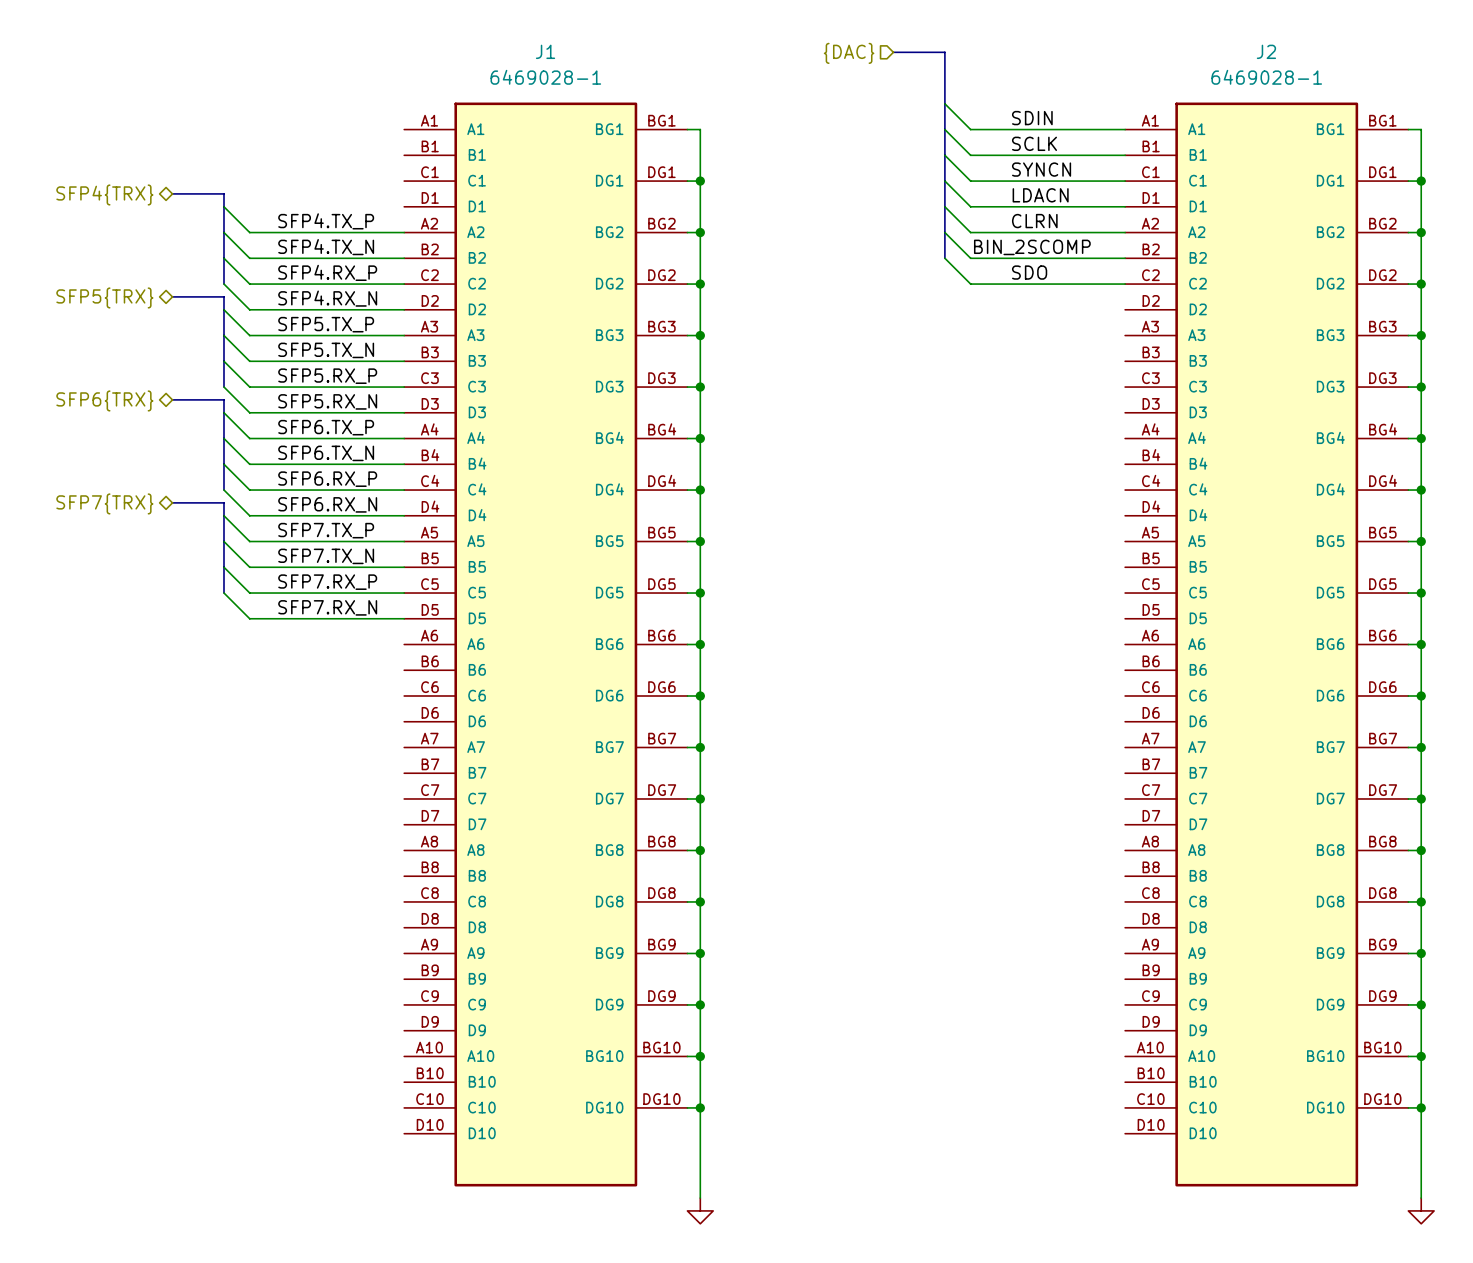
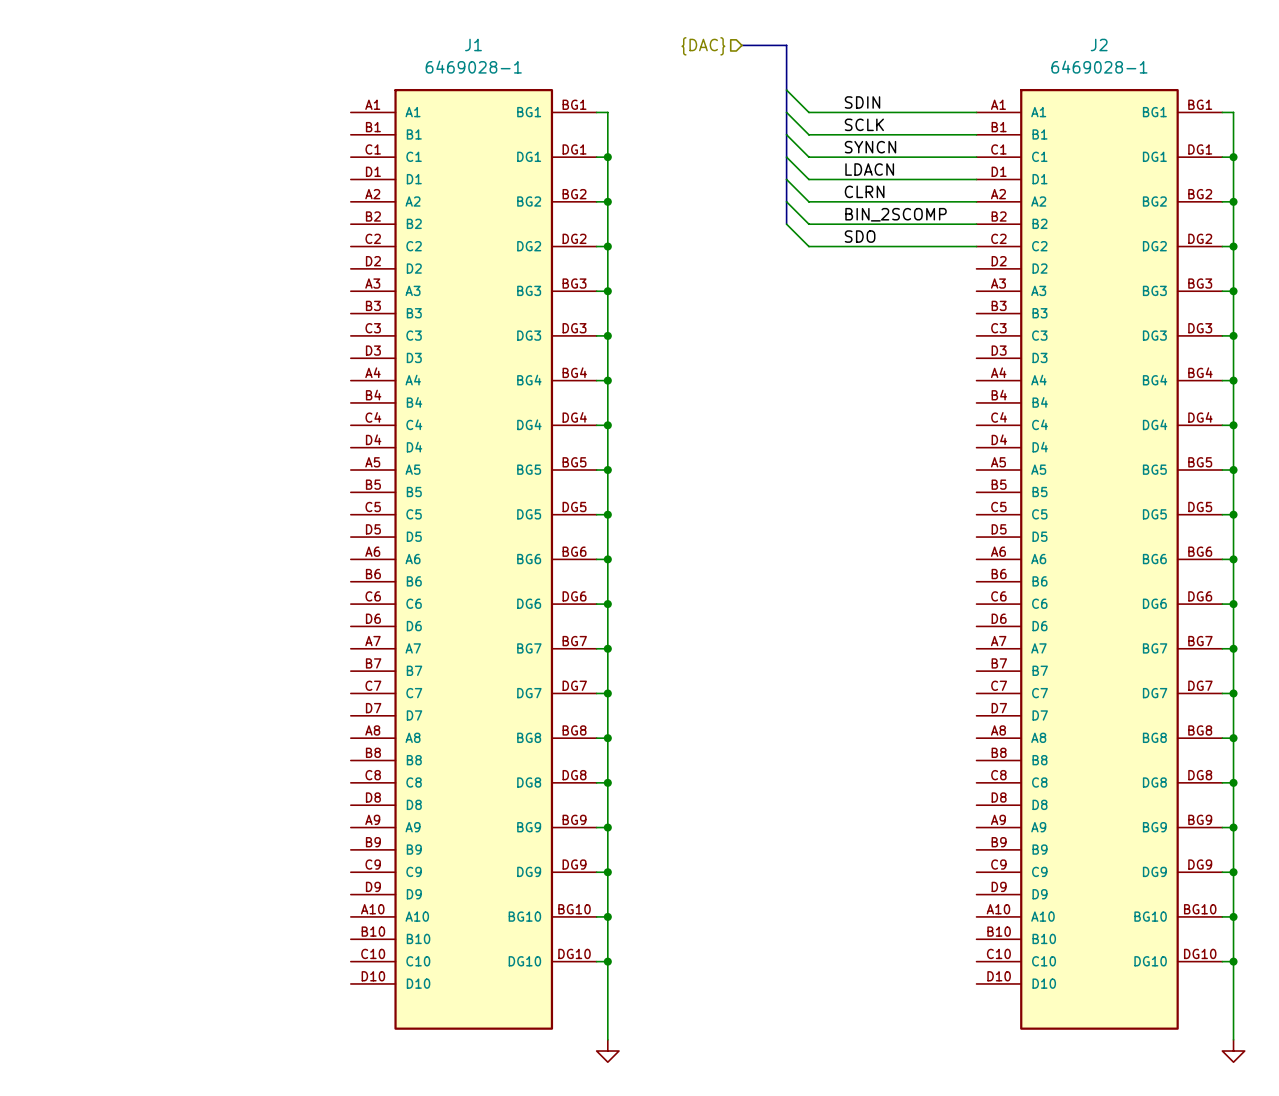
bus: none -> (741, 45) (775, 45)
bus: (906, 52) (944, 52) (944, 258) -> (786, 45) (786, 224)
hierarchical label position: {DAC} (849, 53) -> {DAC} (703, 46)
wire: (944, 103) (970, 129) -> (786, 90) (808, 112) (842, 112)
label position: SDIN (1032, 118) -> SDIN (862, 102)
wire: (944, 129) (970, 155) -> (786, 112) (808, 134) (842, 134)
label position: SCLK (1034, 143) -> SCLK (864, 124)
wire: (944, 155) (970, 181) -> (786, 134) (808, 157) (842, 157)
label position: SYNCN (1041, 169) -> SYNCN (870, 147)
wire: (944, 181) (970, 206) -> (786, 157) (808, 179) (842, 179)
bus: (172, 193) (223, 193) (223, 284) -> none
hierarchical label: SFP4{TRX} (104, 194) -> none
label position: LDACN (1040, 195) -> LDACN (869, 169)
wire: (223, 206) (249, 232) (404, 232) -> none
wire: (944, 206) (970, 232) -> (786, 179) (808, 201) (842, 201)
label: SFP4.TX_P (326, 221) -> none
label position: CLRN (1034, 221) -> CLRN (864, 191)
wire: (223, 232) (249, 258) (404, 258) -> none
wire: (944, 232) (970, 258) -> (786, 201) (808, 224) (842, 224)
label: SFP4.TX_N (326, 247) -> none
wire: (223, 258) (249, 284) (404, 284) -> none
wire: (944, 258) (970, 284) -> (786, 224) (808, 246) (842, 246)
label: SFP4.RX_P (327, 272) -> none
label position: SDO (1029, 272) -> SDO (860, 236)
wire: (223, 284) (249, 309) (404, 309) -> none
bus: (172, 296) (223, 296) (223, 387) -> none
hierarchical label: SFP5{TRX} (104, 297) -> none
label: SFP4.RX_N (327, 298) -> none
wire: (223, 309) (249, 335) (404, 335) -> none
label: SFP5.TX_P (326, 324) -> none
wire: (223, 335) (249, 361) (404, 361) -> none
label: SFP5.TX_N (326, 350) -> none
wire: (223, 361) (249, 387) (404, 387) -> none
label: SFP5.RX_P (327, 376) -> none
wire: (223, 387) (249, 412) (404, 412) -> none
bus: (172, 399) (223, 399) (223, 490) -> none
hierarchical label: SFP6{TRX} (104, 400) -> none
label: SFP5.RX_N (327, 401) -> none
wire: (223, 412) (249, 438) (404, 438) -> none
label: SFP6.TX_P (326, 427) -> none
wire: (223, 438) (249, 464) (404, 464) -> none
label: SFP6.TX_N (326, 453) -> none
wire: (223, 464) (249, 490) (404, 490) -> none
label: SFP6.RX_P (327, 479) -> none
wire: (223, 490) (249, 515) (404, 515) -> none
bus: (172, 502) (223, 502) (223, 593) -> none
hierarchical label: SFP7{TRX} (104, 503) -> none
label: SFP6.RX_N (327, 504) -> none
wire: (223, 515) (249, 541) (404, 541) -> none
label: SFP7.TX_P (326, 530) -> none
wire: (223, 541) (249, 567) (404, 567) -> none
label: SFP7.TX_N (326, 556) -> none
wire: (223, 567) (249, 593) (404, 593) -> none
label: SFP7.RX_P (327, 582) -> none
wire: (223, 593) (249, 618) (404, 618) -> none
label: SFP7.RX_N (327, 607) -> none

